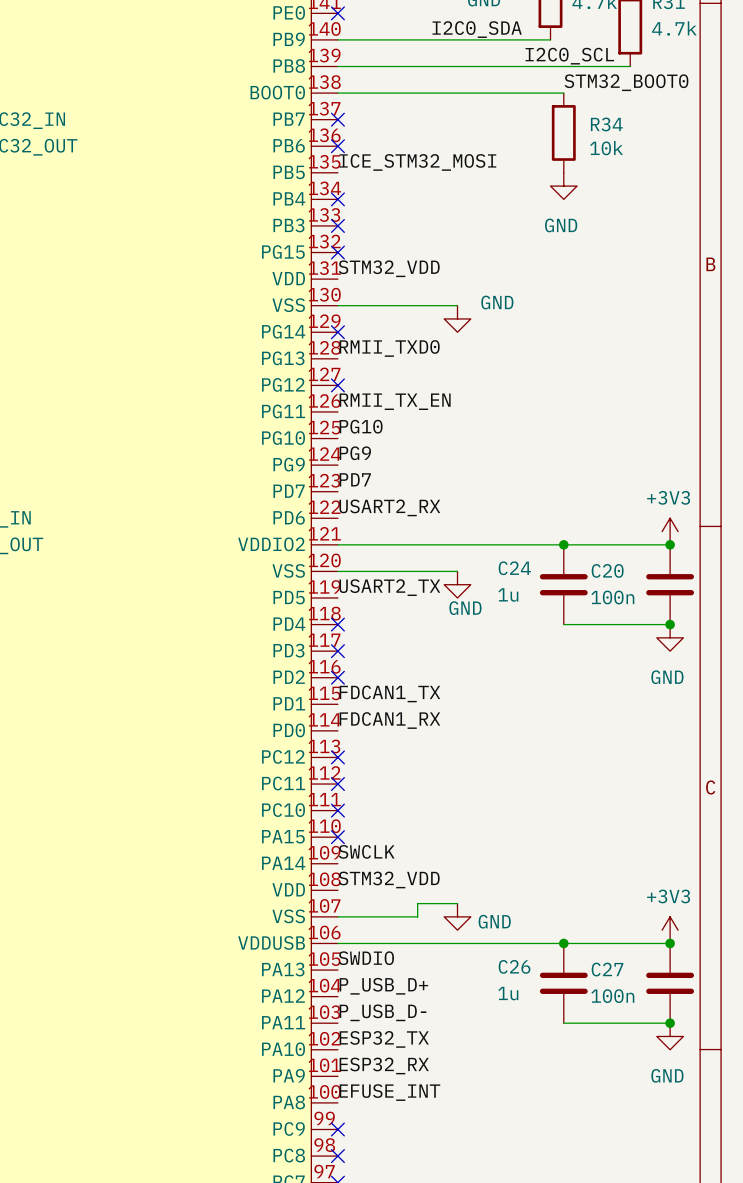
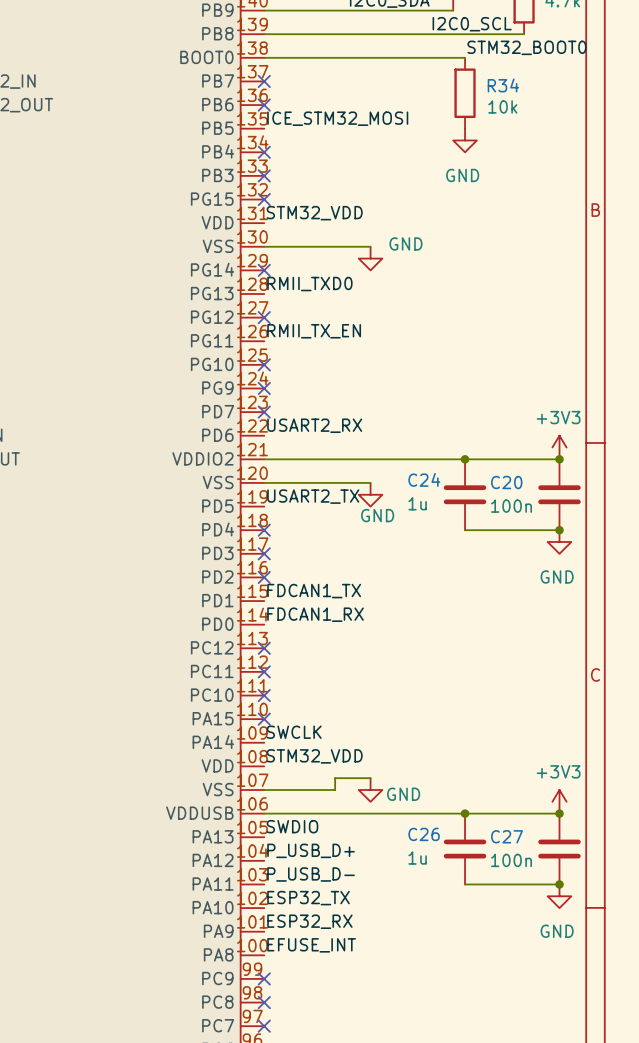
label: PG10 (361, 426) -> none
no-connect mark: none -> (264, 364)
label: PG9 (355, 453) -> none
no-connect mark: none -> (264, 388)
label: PD7 (355, 479) -> none
no-connect mark: none -> (264, 412)

